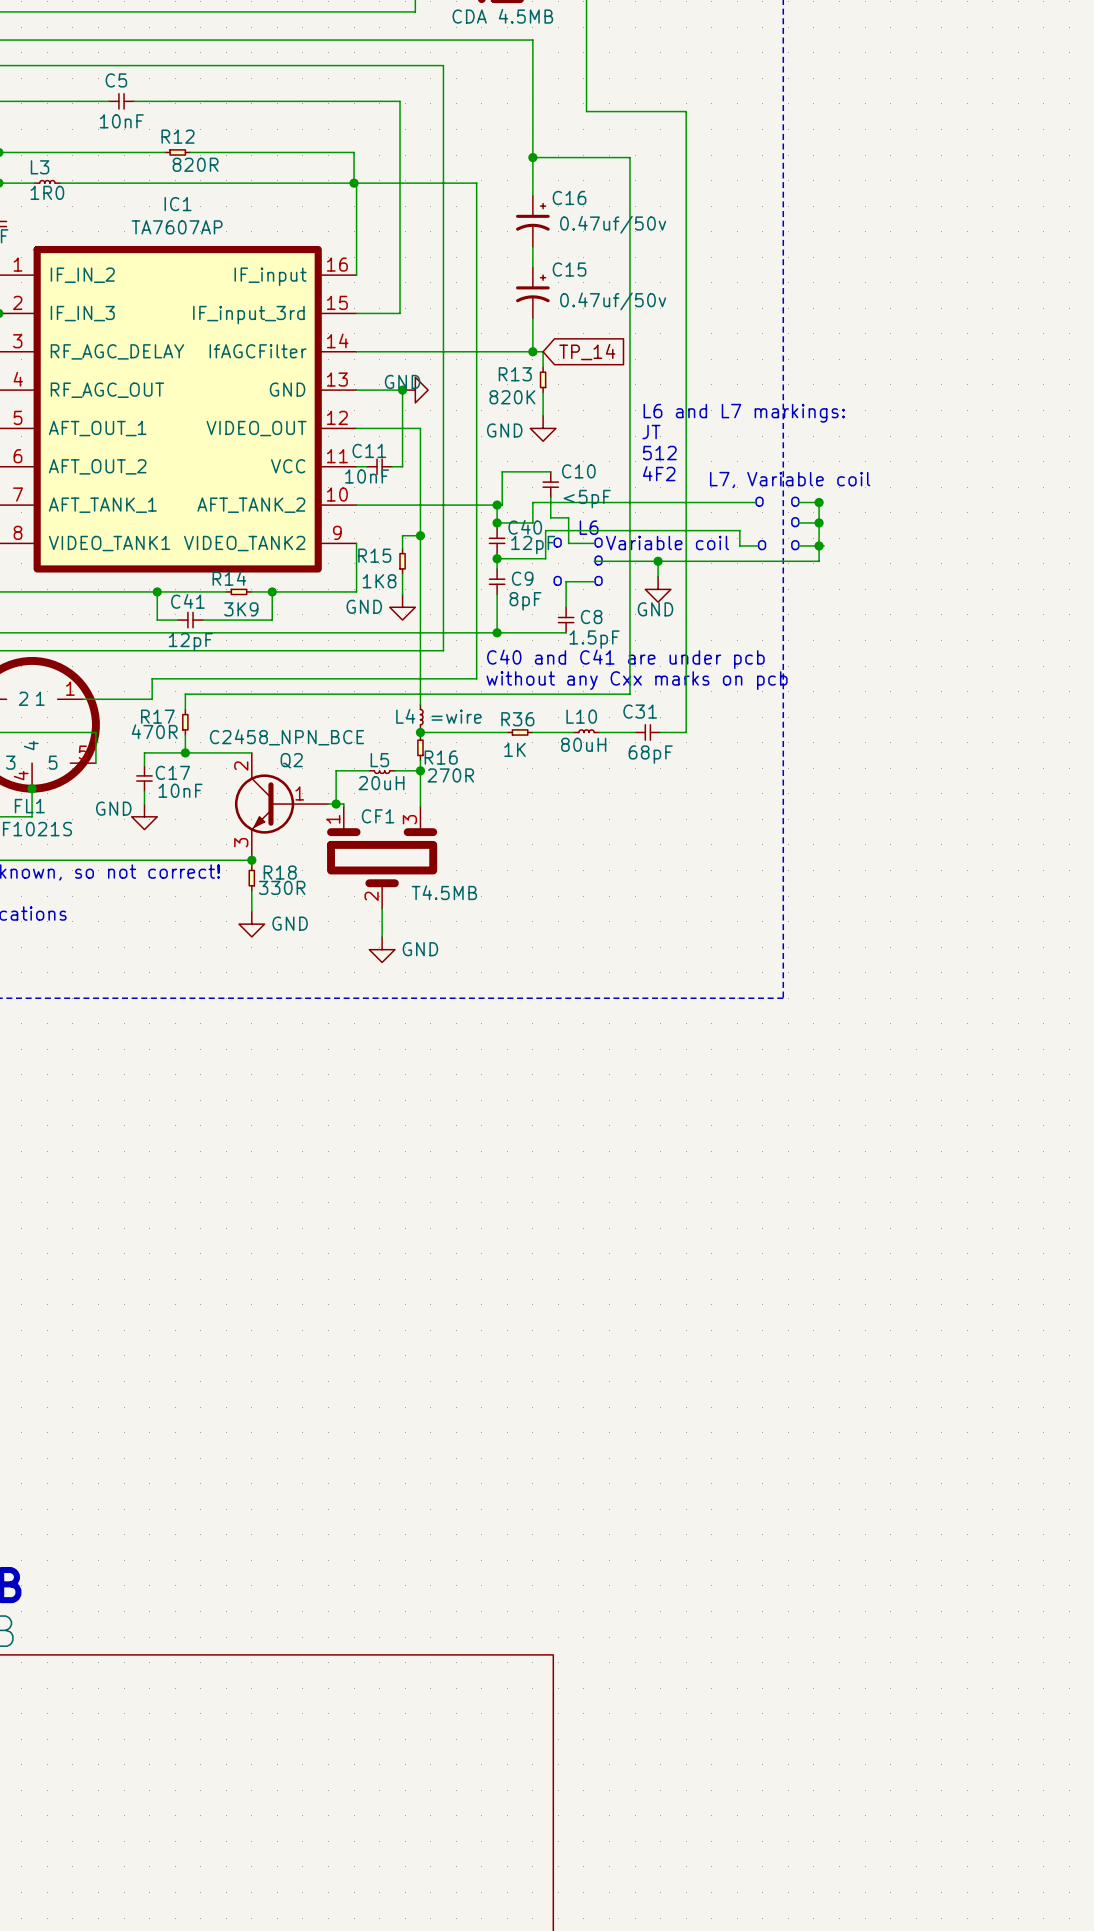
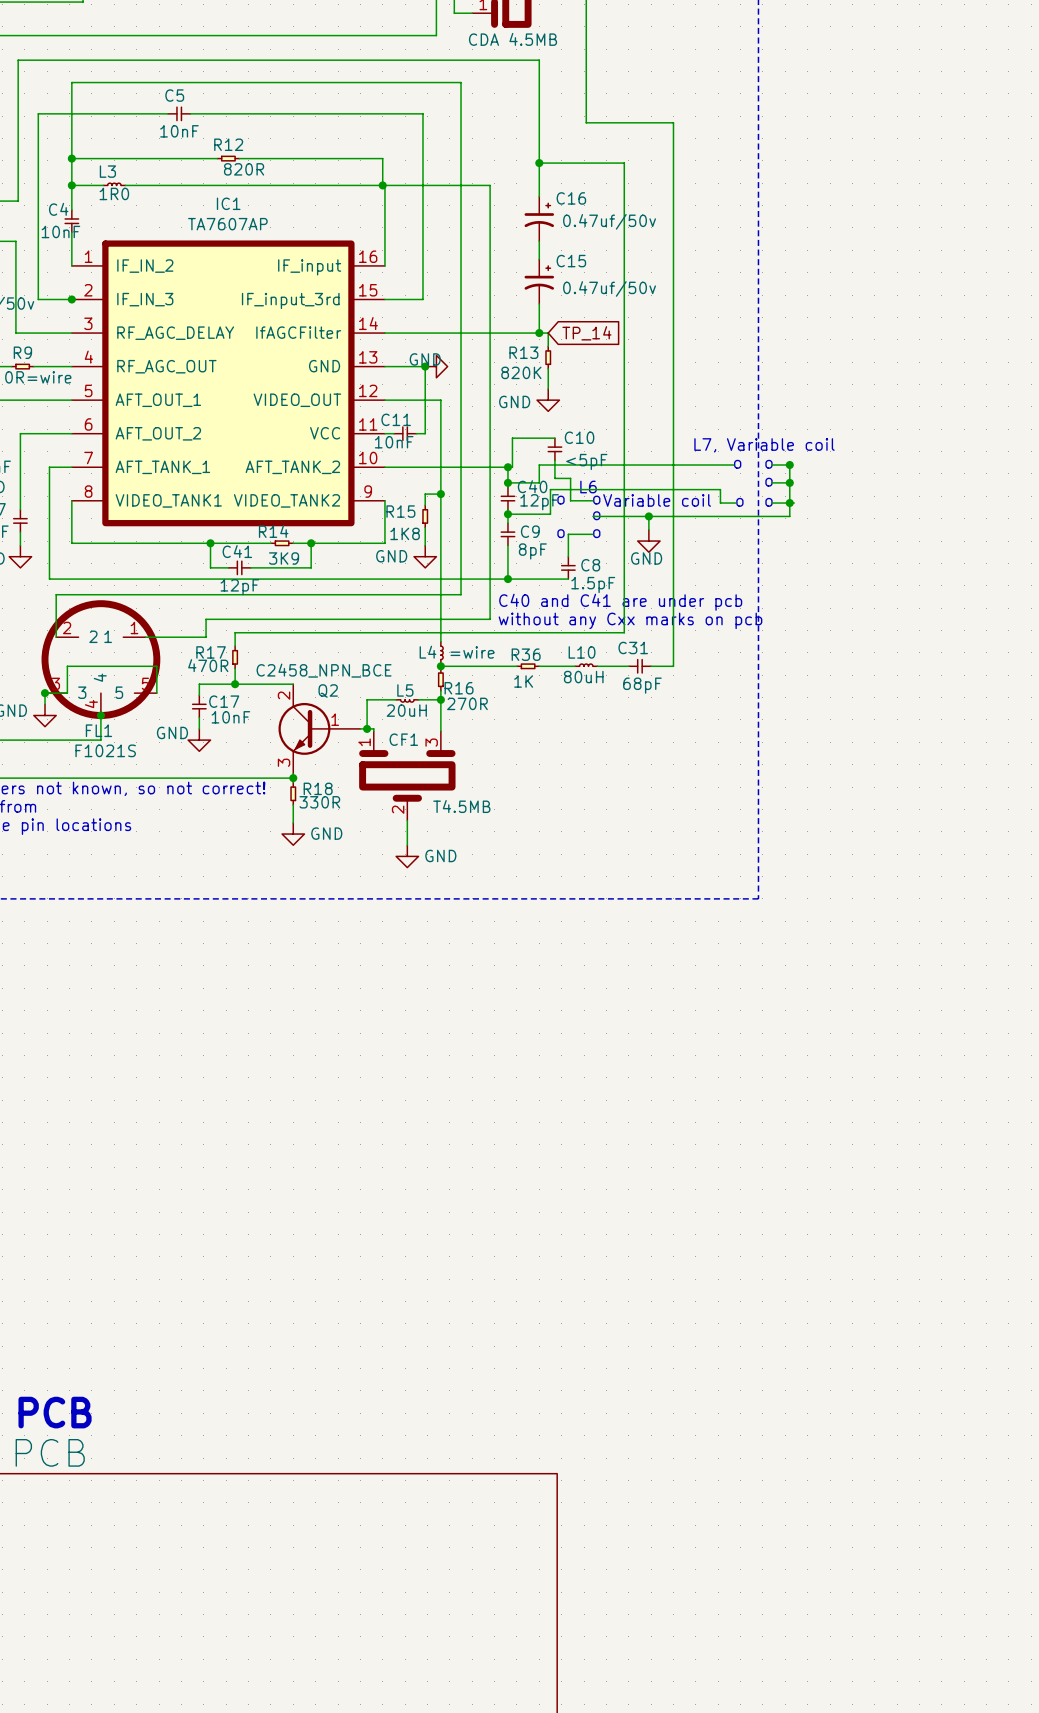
text: L6 and L7 markings: (744, 413) -> none
text: JT (651, 432) -> none
text: 512 (659, 453) -> none
text: 4F2 (659, 473) -> none

